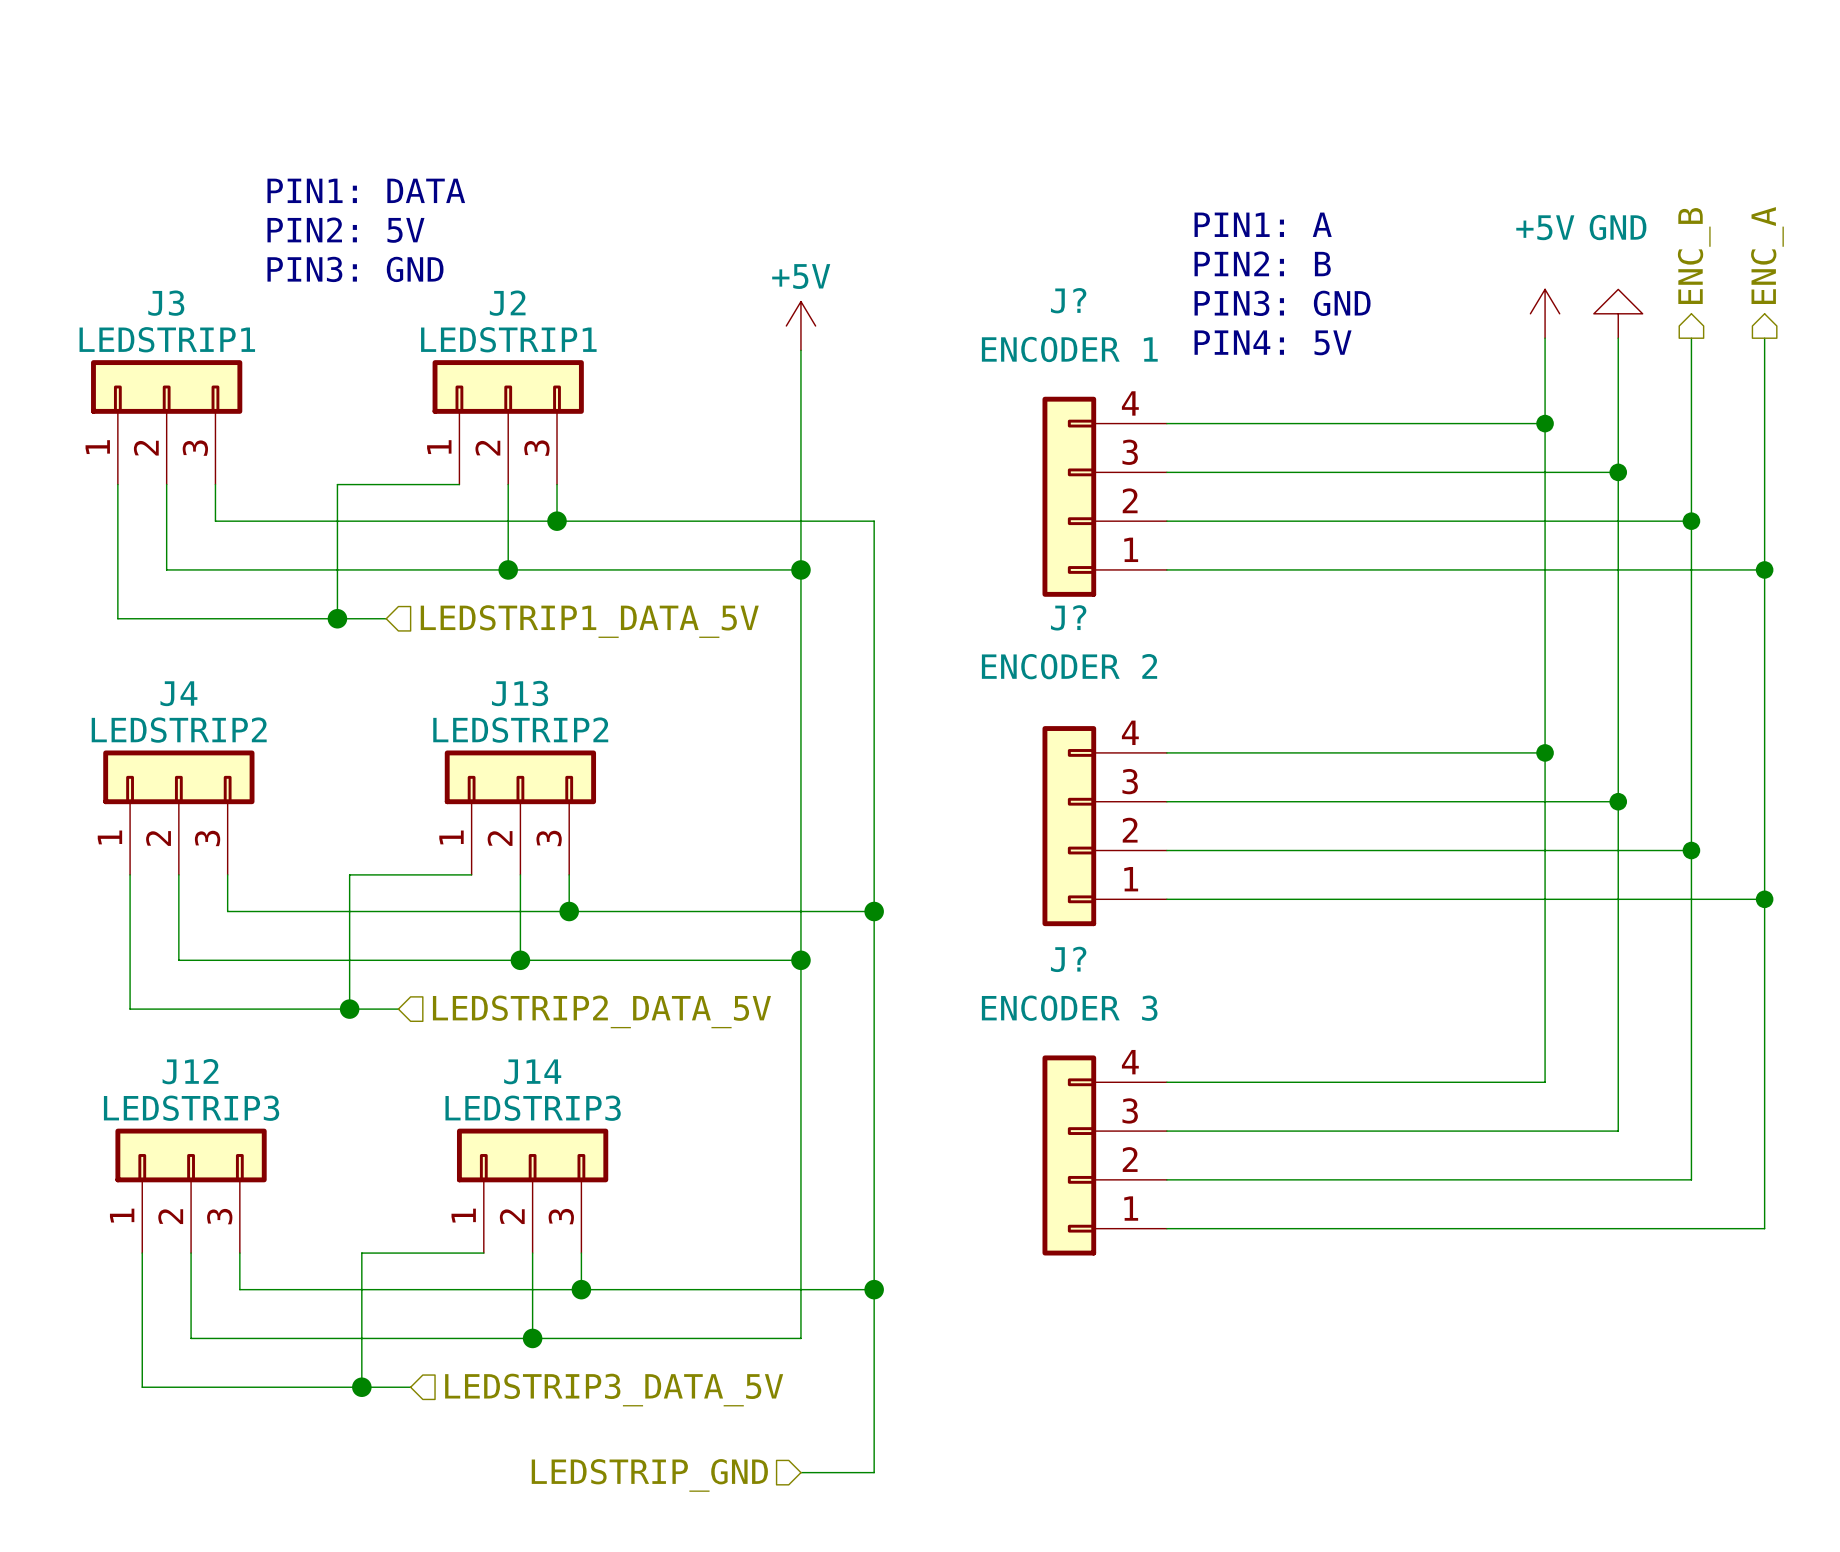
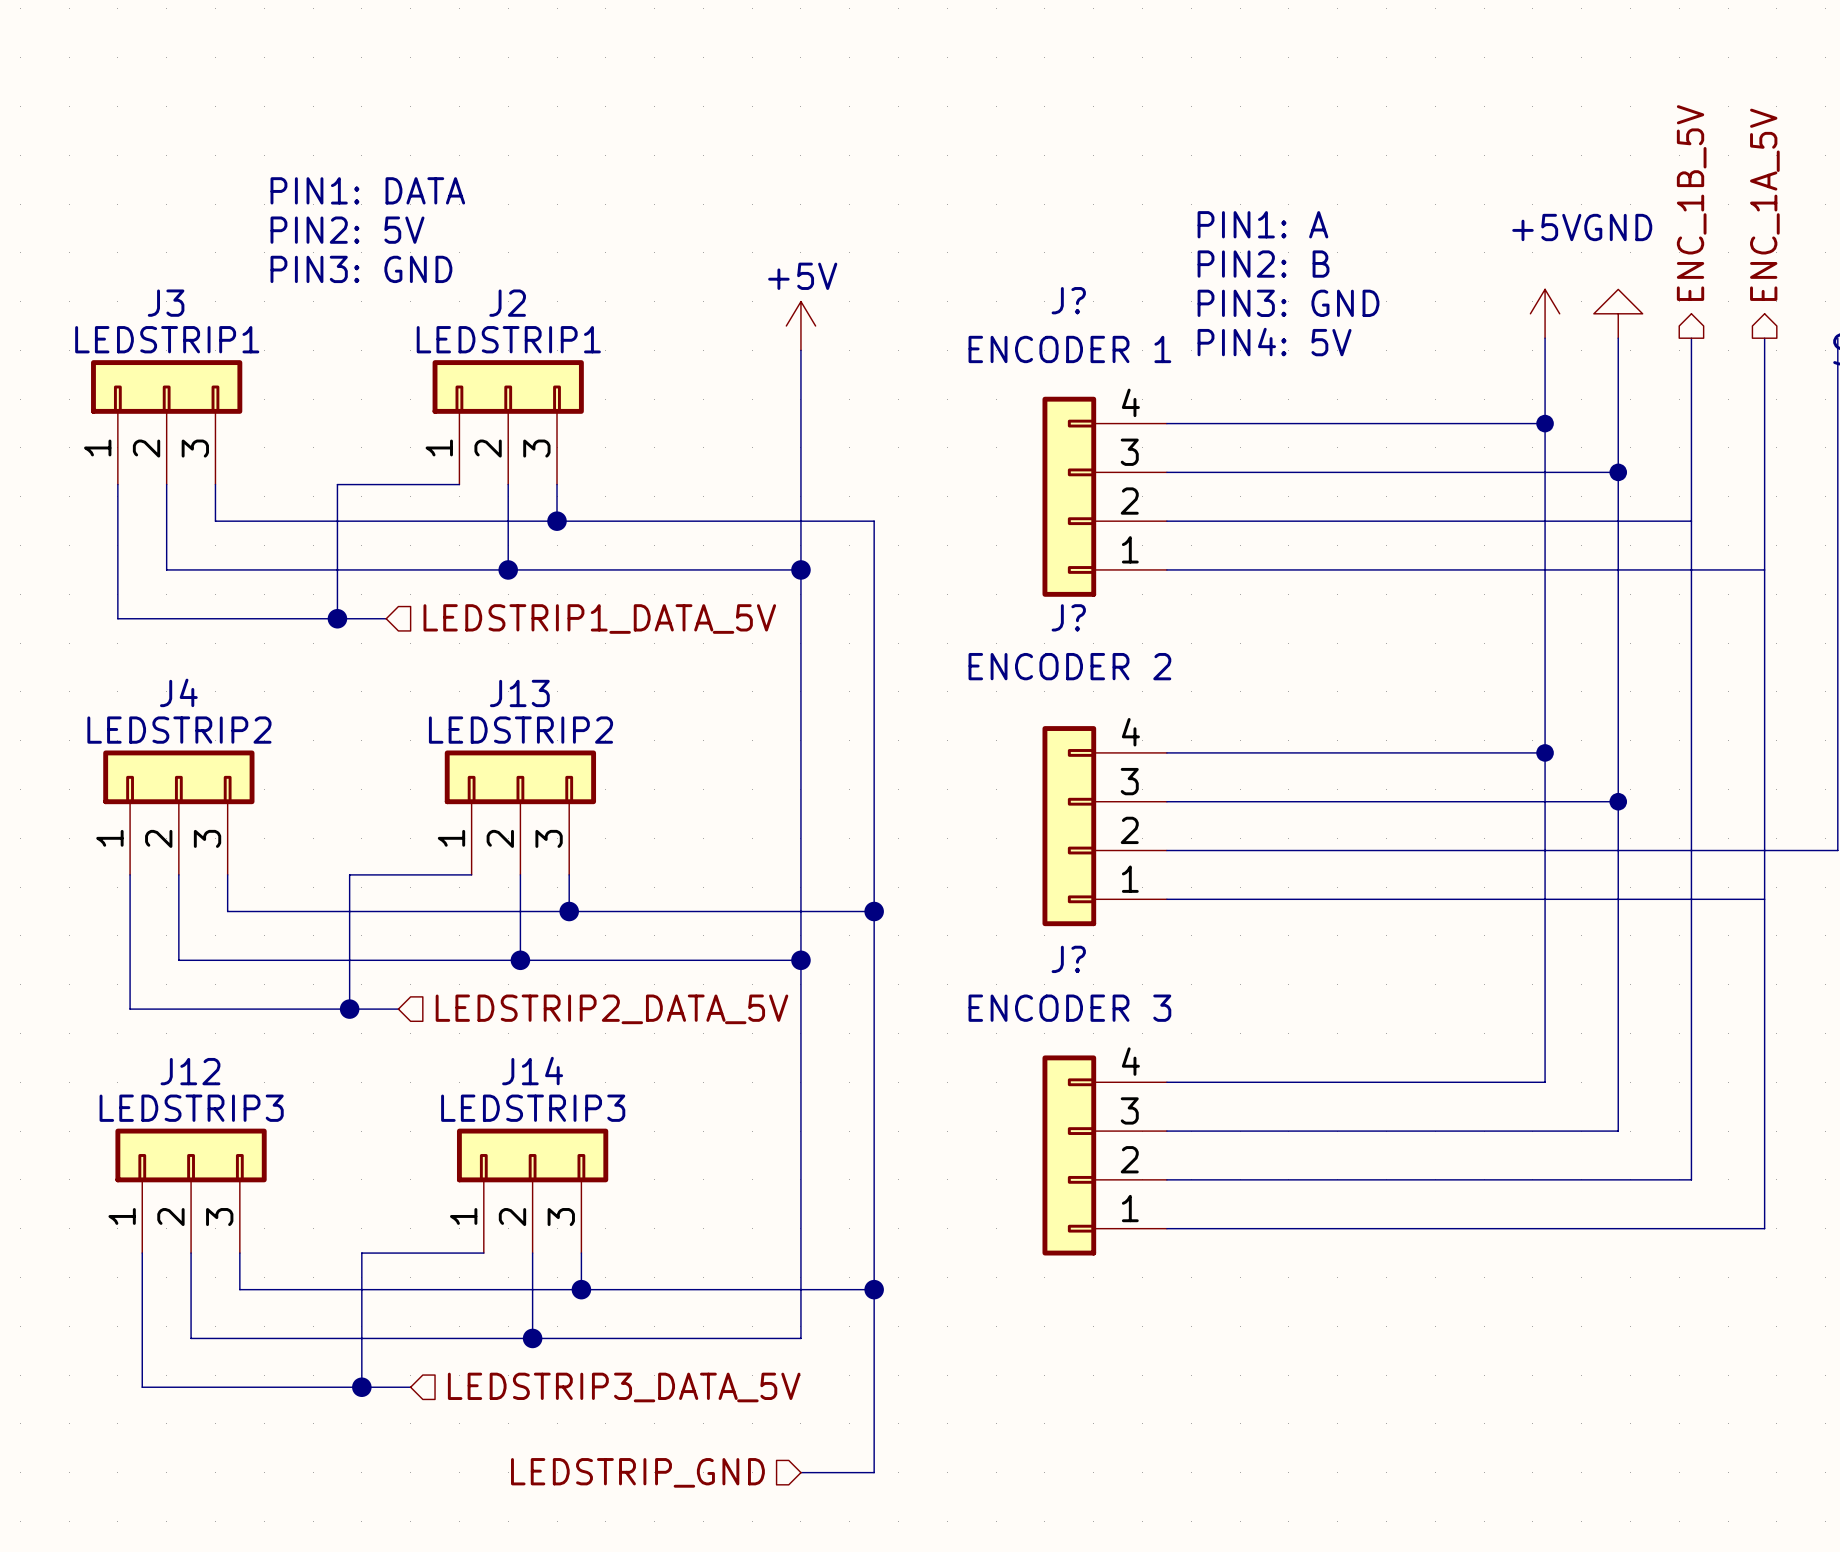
hierarchical label: ENC_A (1767, 255) -> ENC_1A_5V (1764, 204)
hierarchical label: ENC_B (1694, 256) -> ENC_1B_5V (1691, 203)
wire: none -> (1837, 338) (1837, 850) (1691, 850)
junction: (1691, 521) -> none
junction: (1764, 569) -> none
junction: (1691, 850) -> none
junction: (1764, 899) -> none

